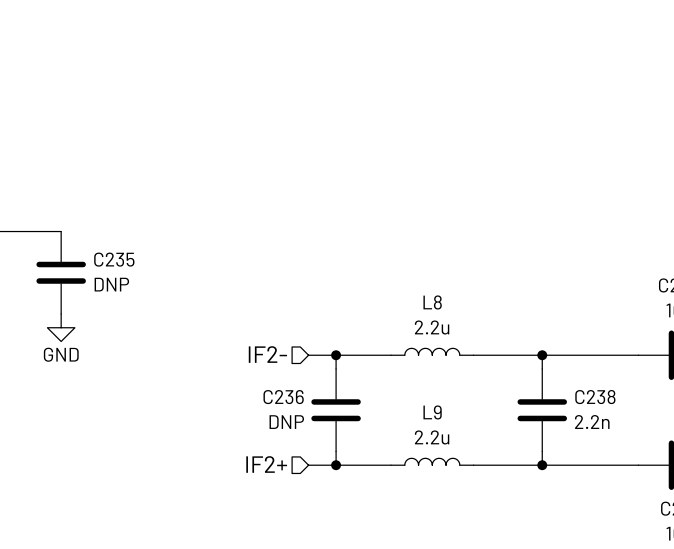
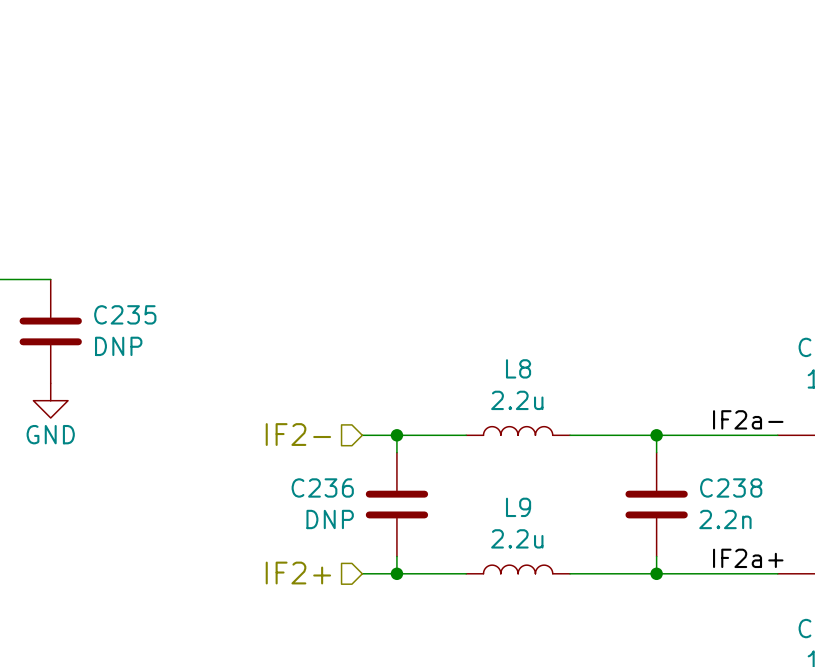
label: none -> IF2a- (748, 419)
label: none -> IF2a+ (748, 558)

